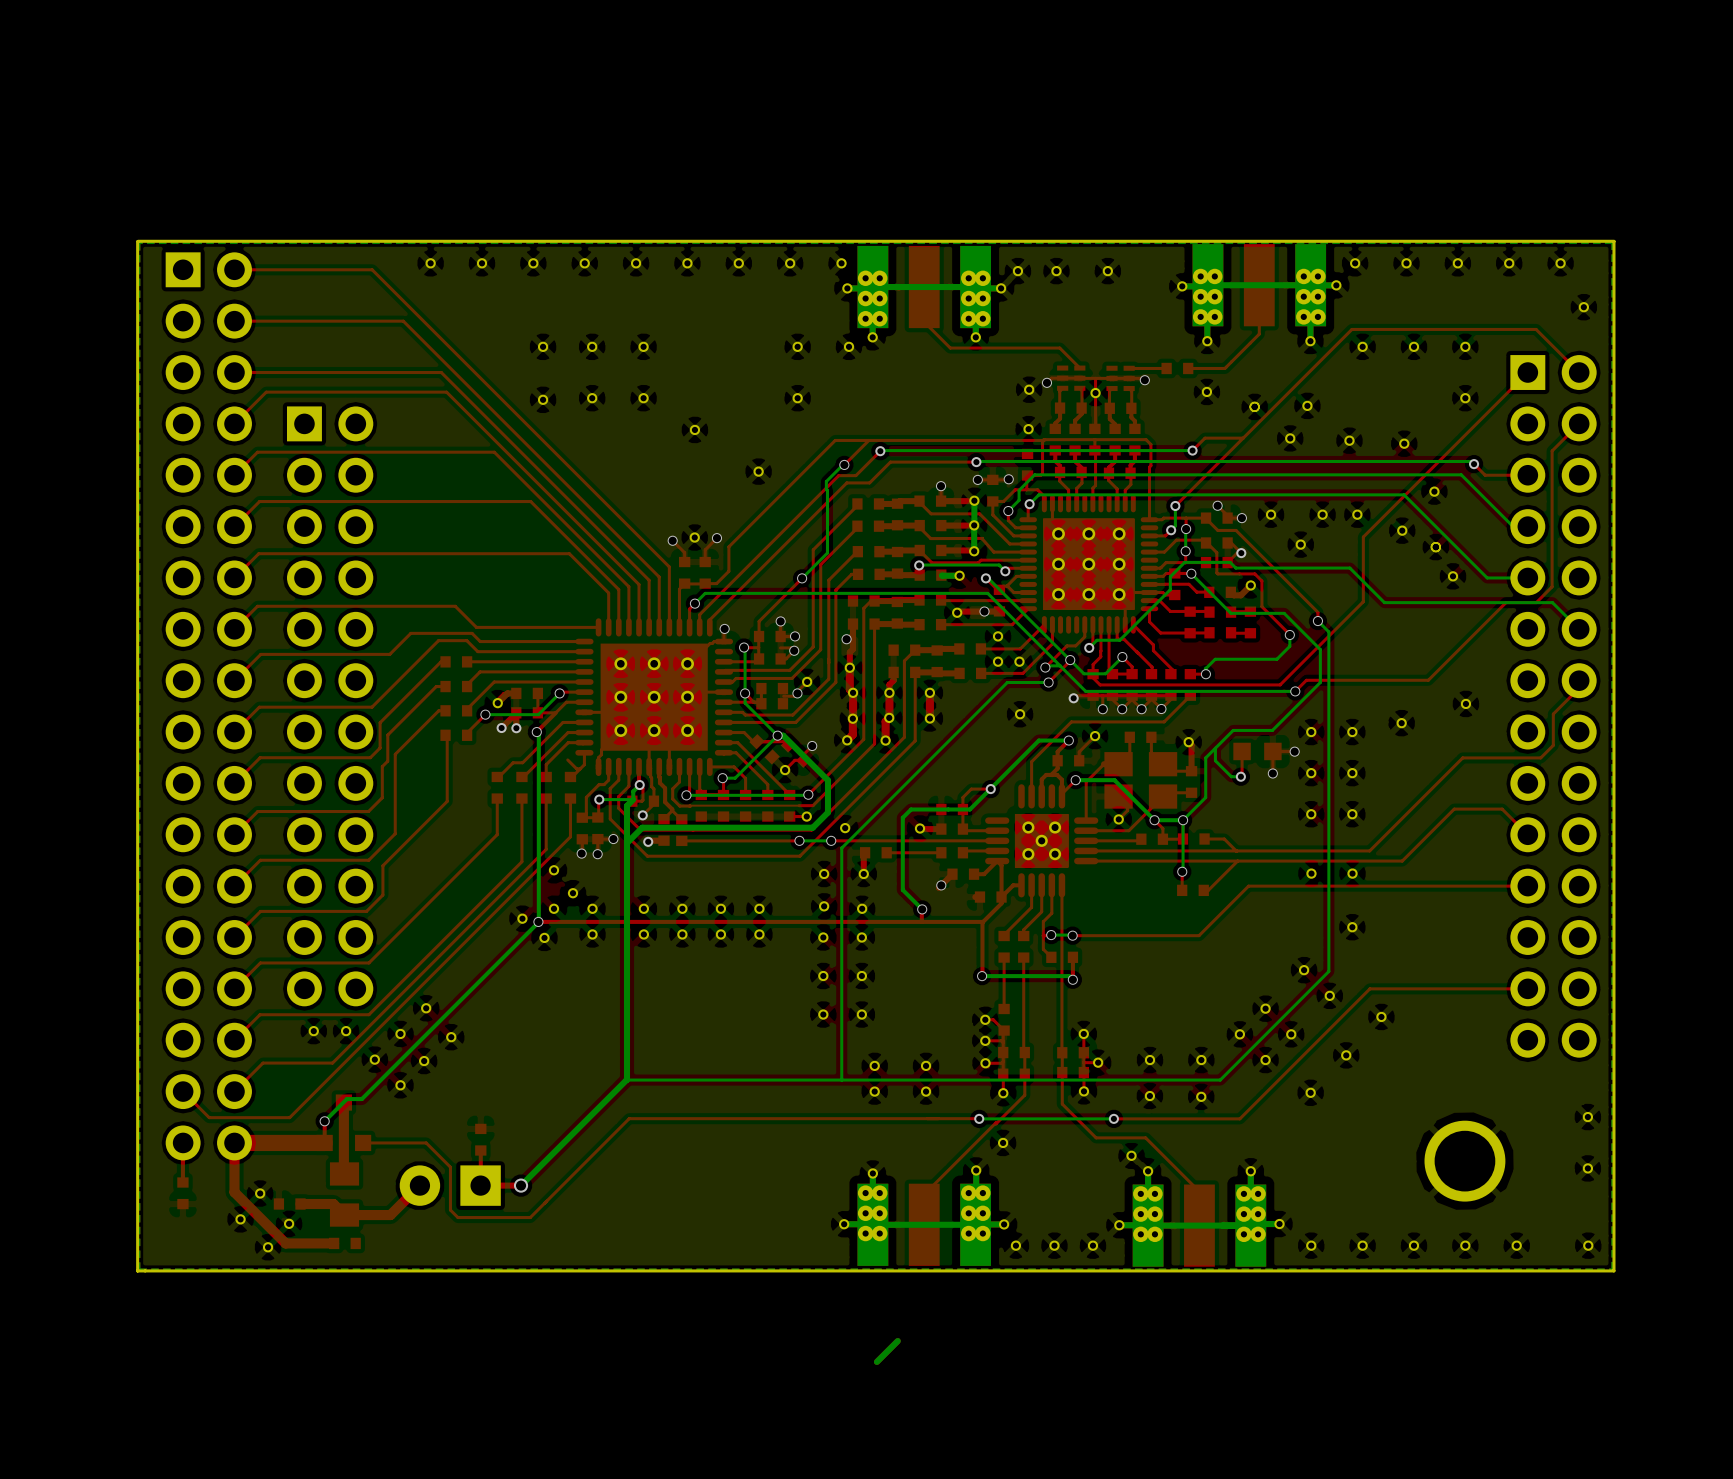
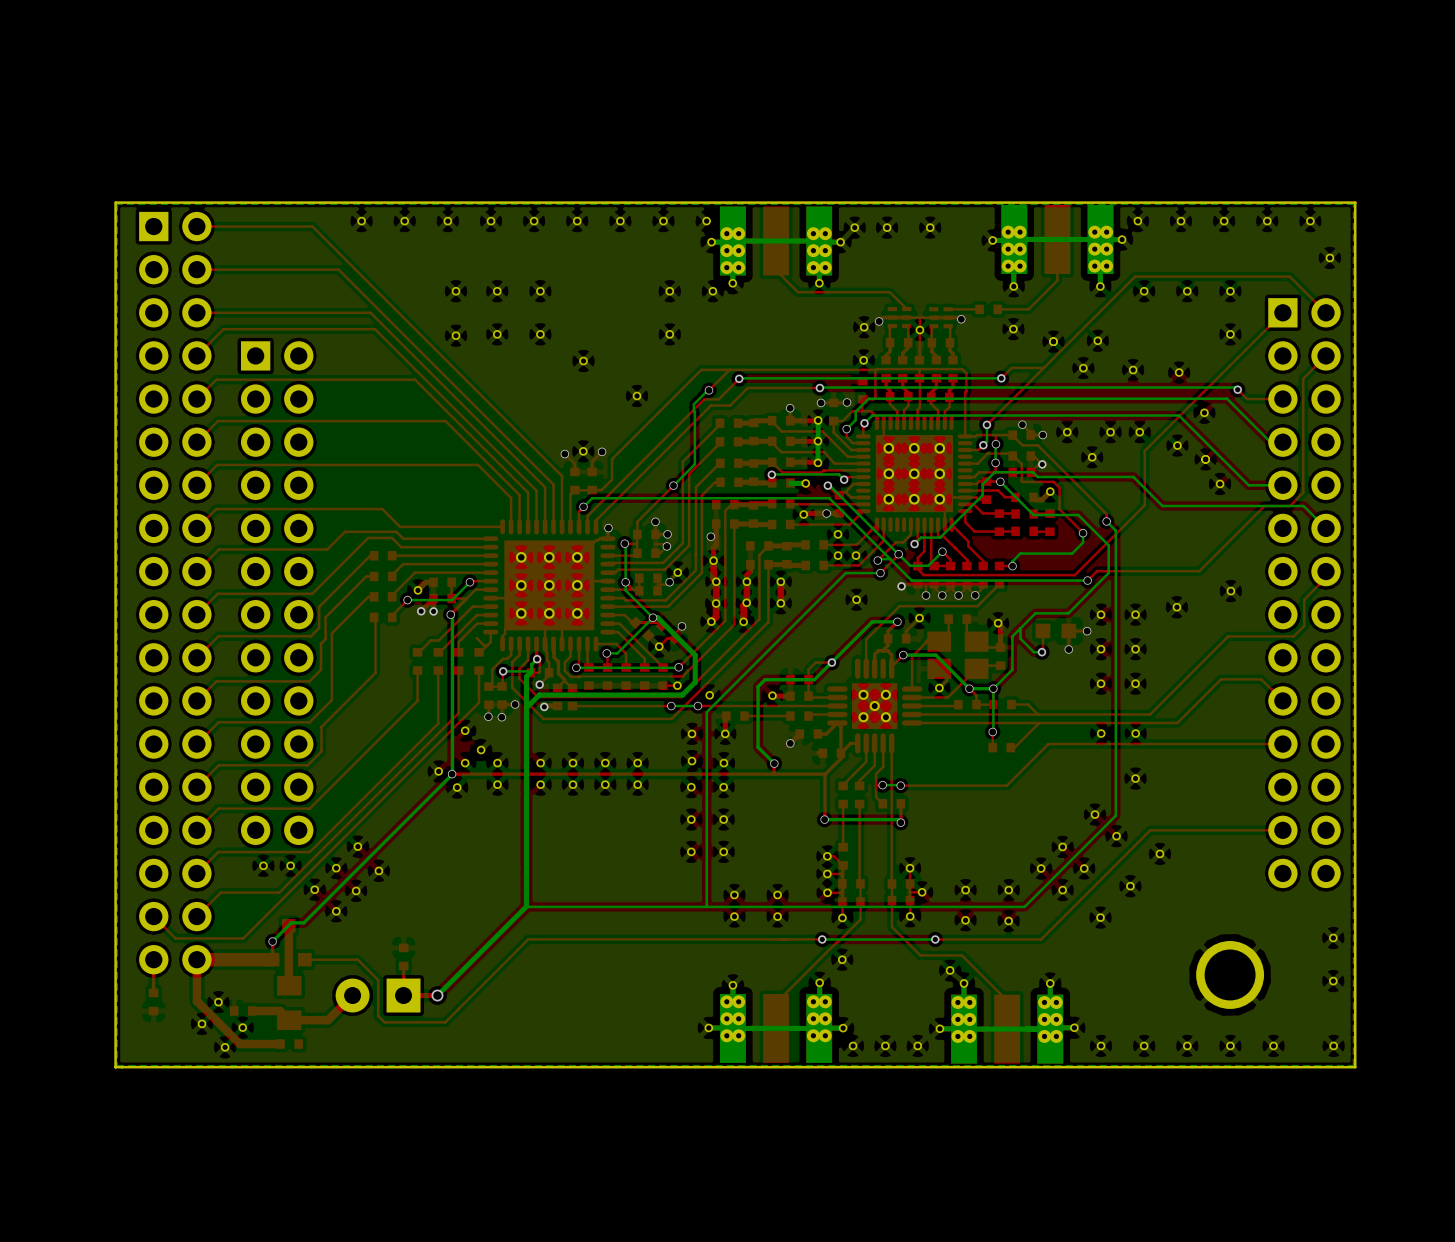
bottom track: (897, 1341) (876, 1361) -> none

